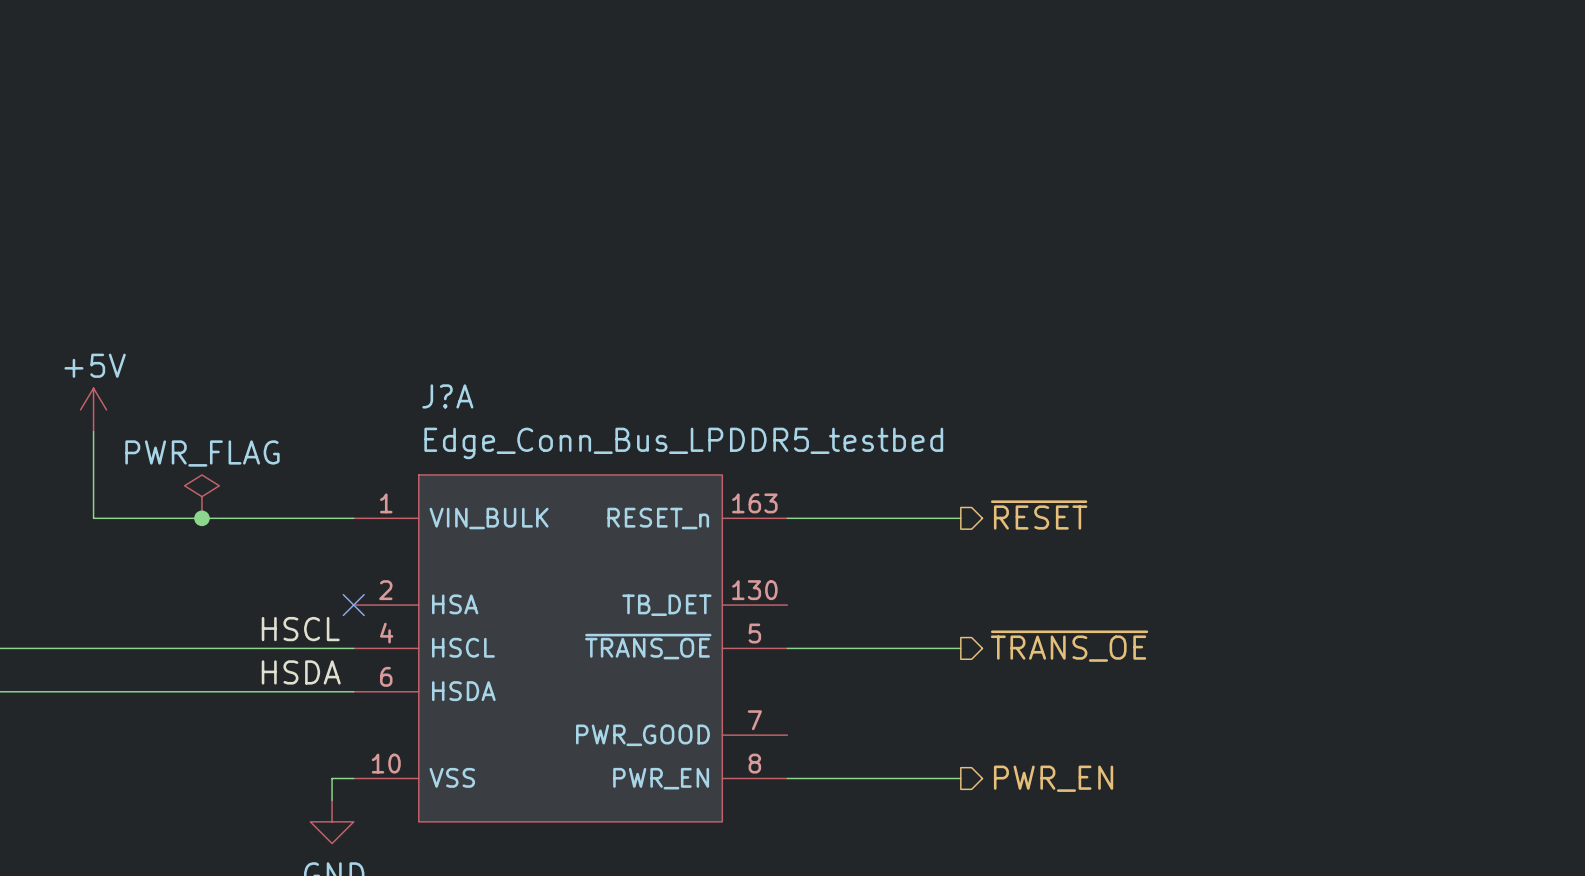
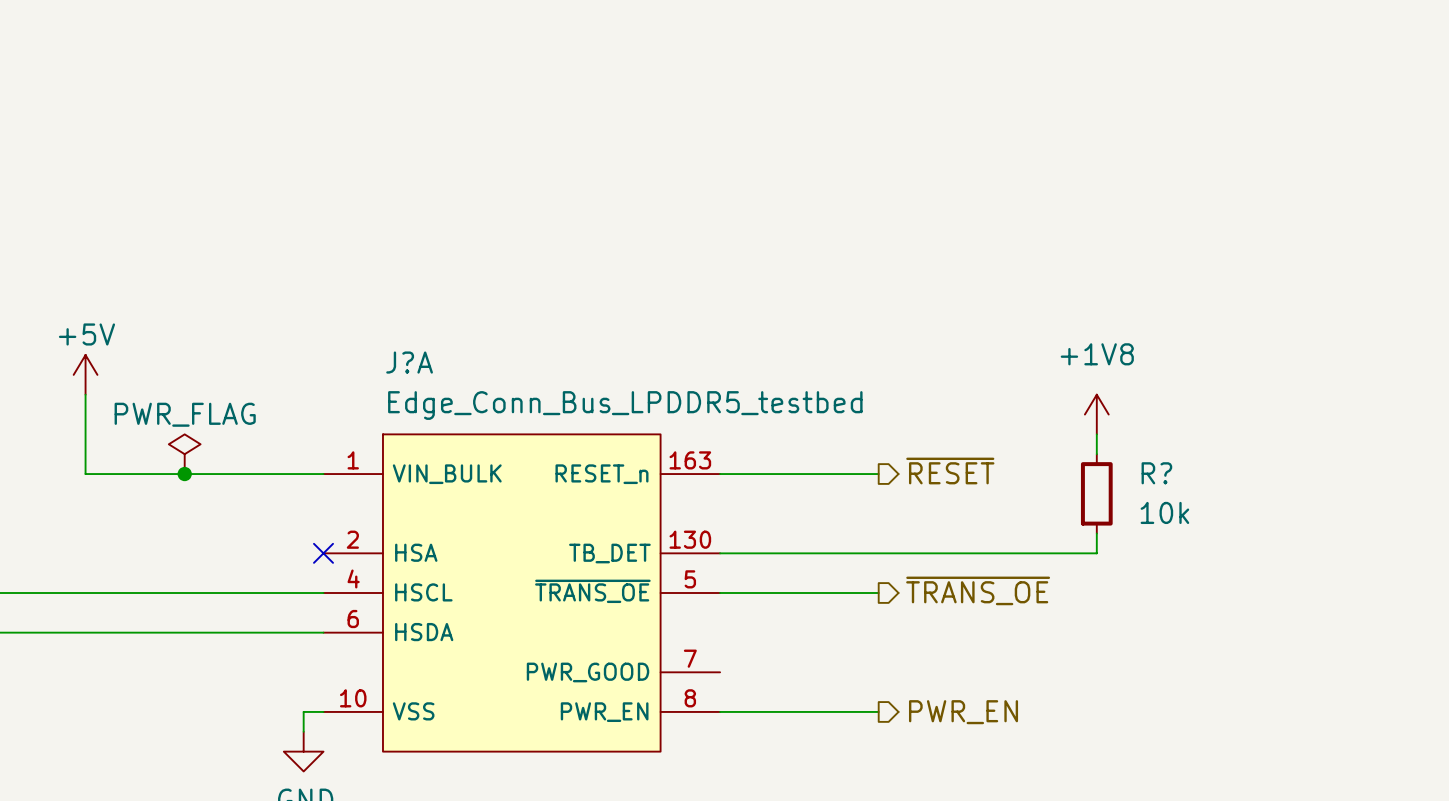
power symbol: none -> +1V8 (1096, 414)
wire: none -> (1096, 434) (1096, 454)
R?: none -> (1096, 493)
wire: none -> (1096, 533) (1096, 553) (720, 553)
label: HSCL (300, 629) -> none
label: HSDA (301, 672) -> none

